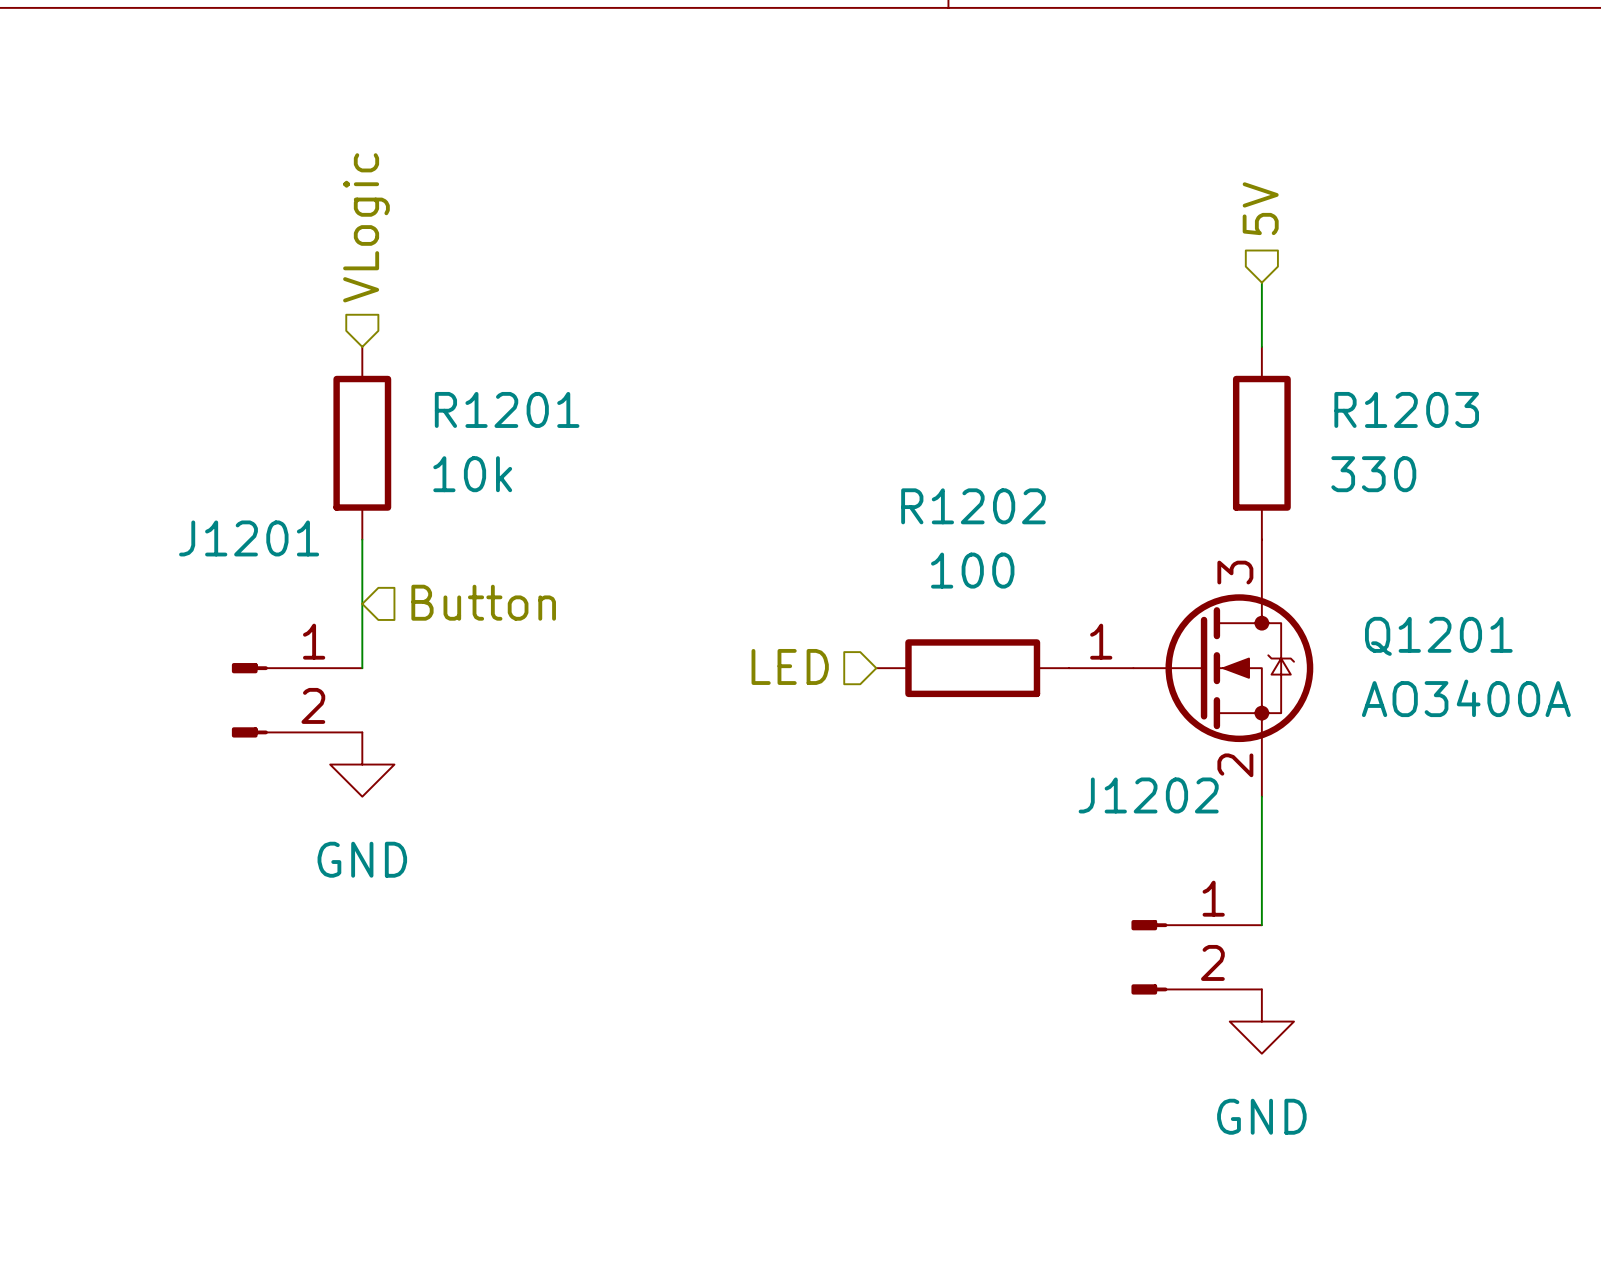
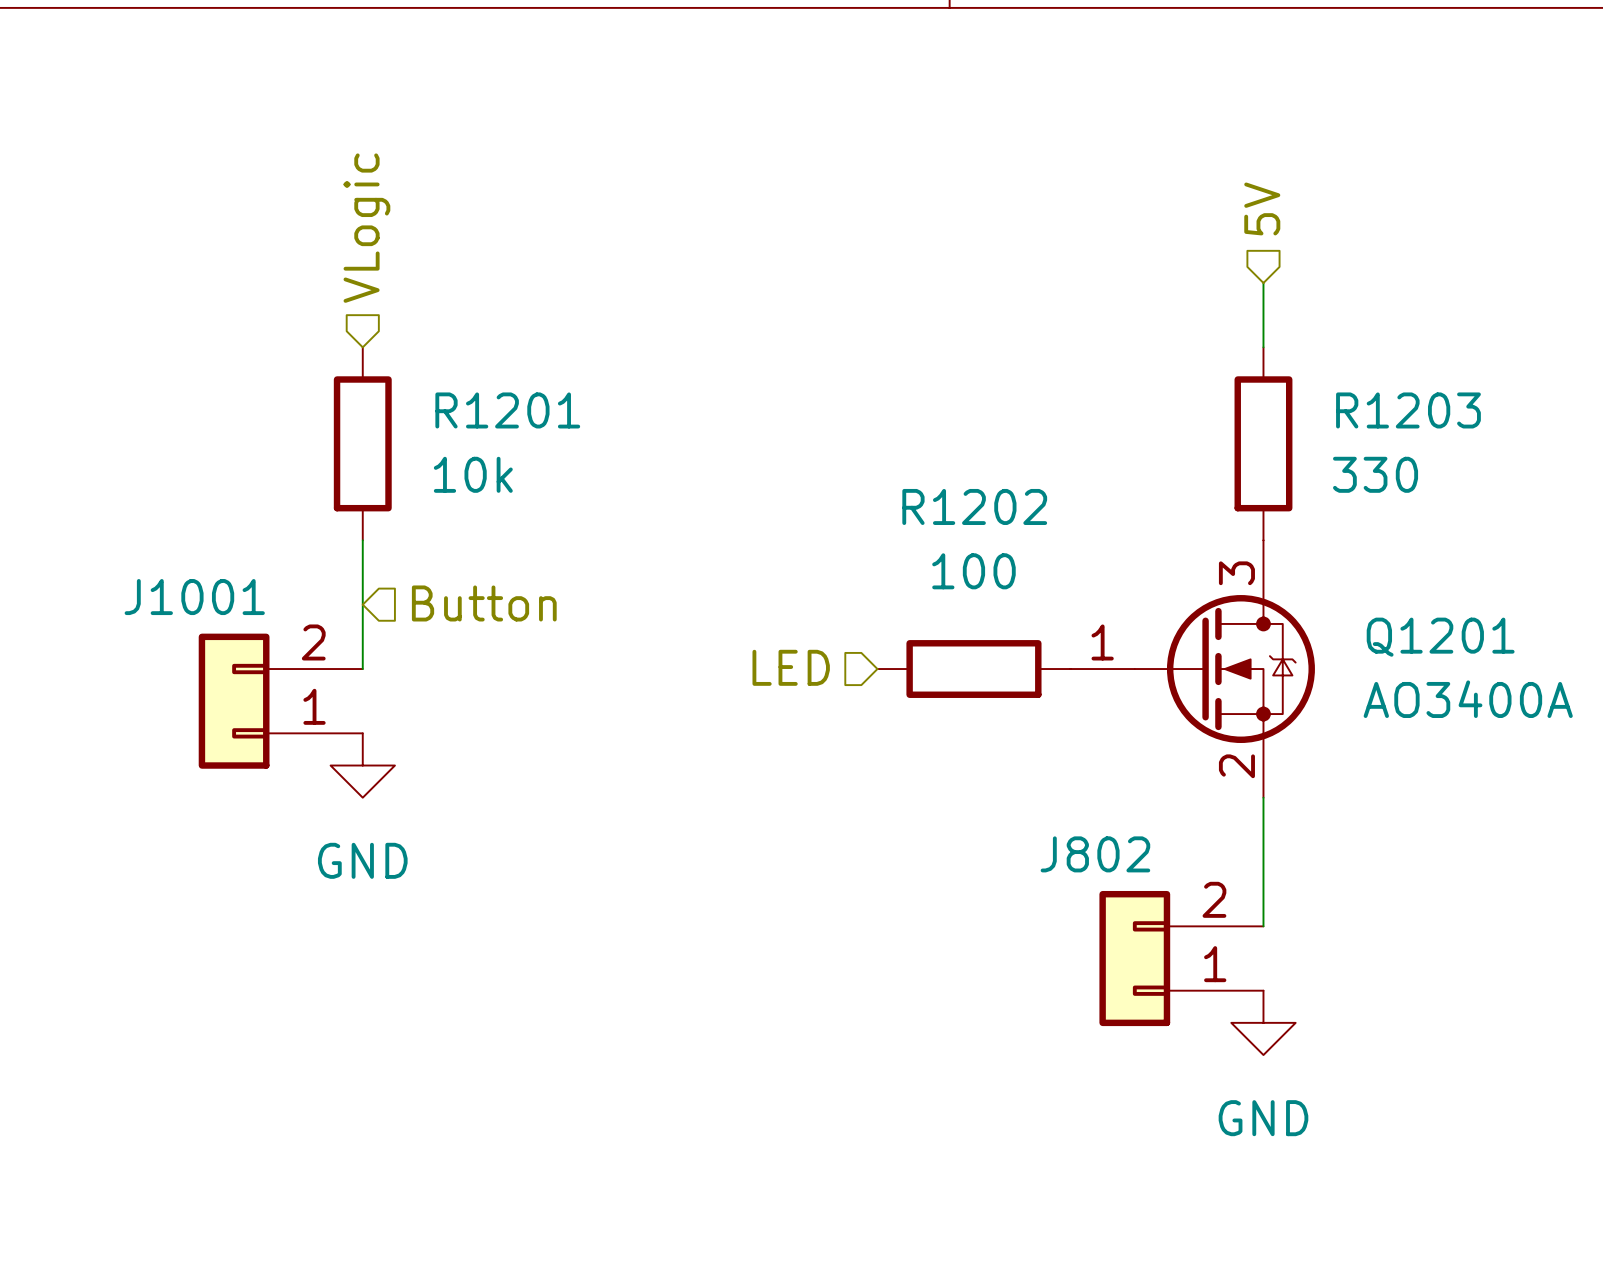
J1001: none -> (280, 701)
J1201: (297, 700) -> none
J802: none -> (1181, 958)
J1202: (1196, 957) -> none

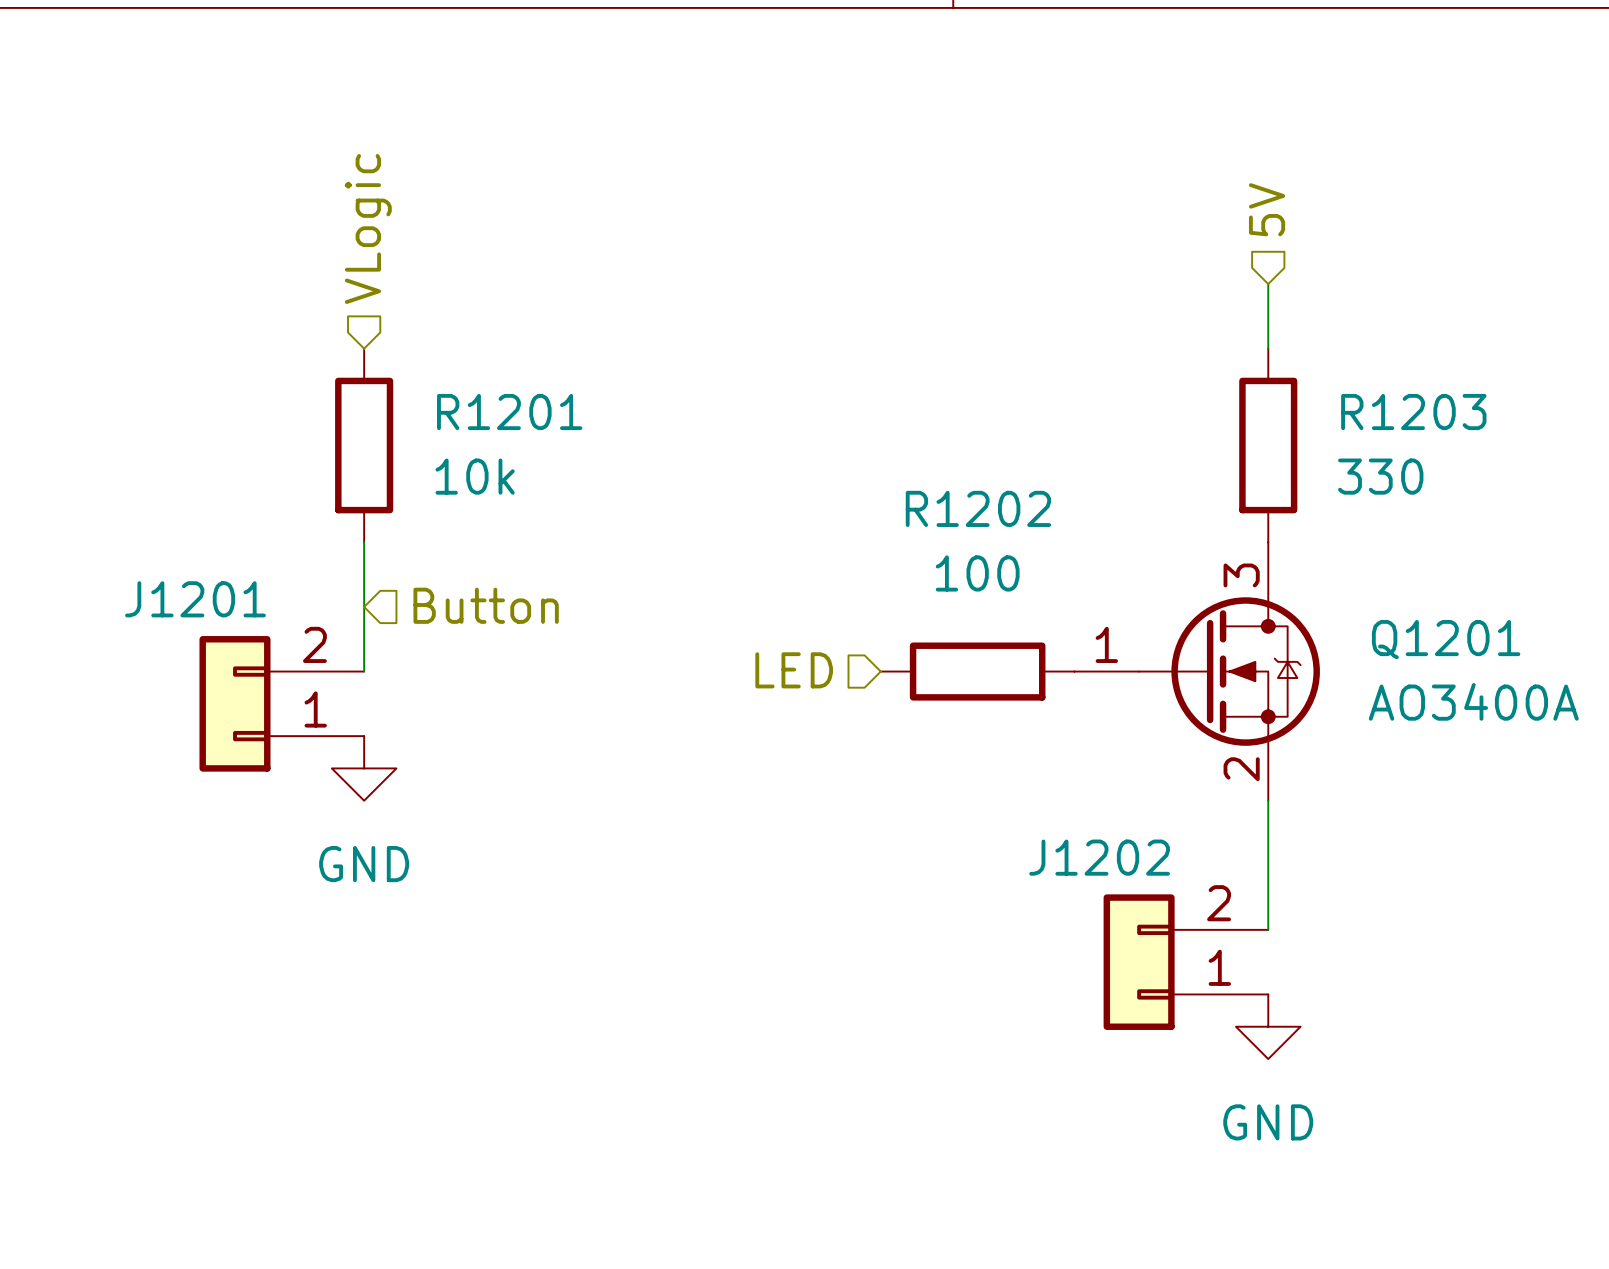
J1001 name: J1001 (194, 597) -> J1201 (195, 599)
J802 name: J802 (1095, 854) -> J1202 (1099, 857)

